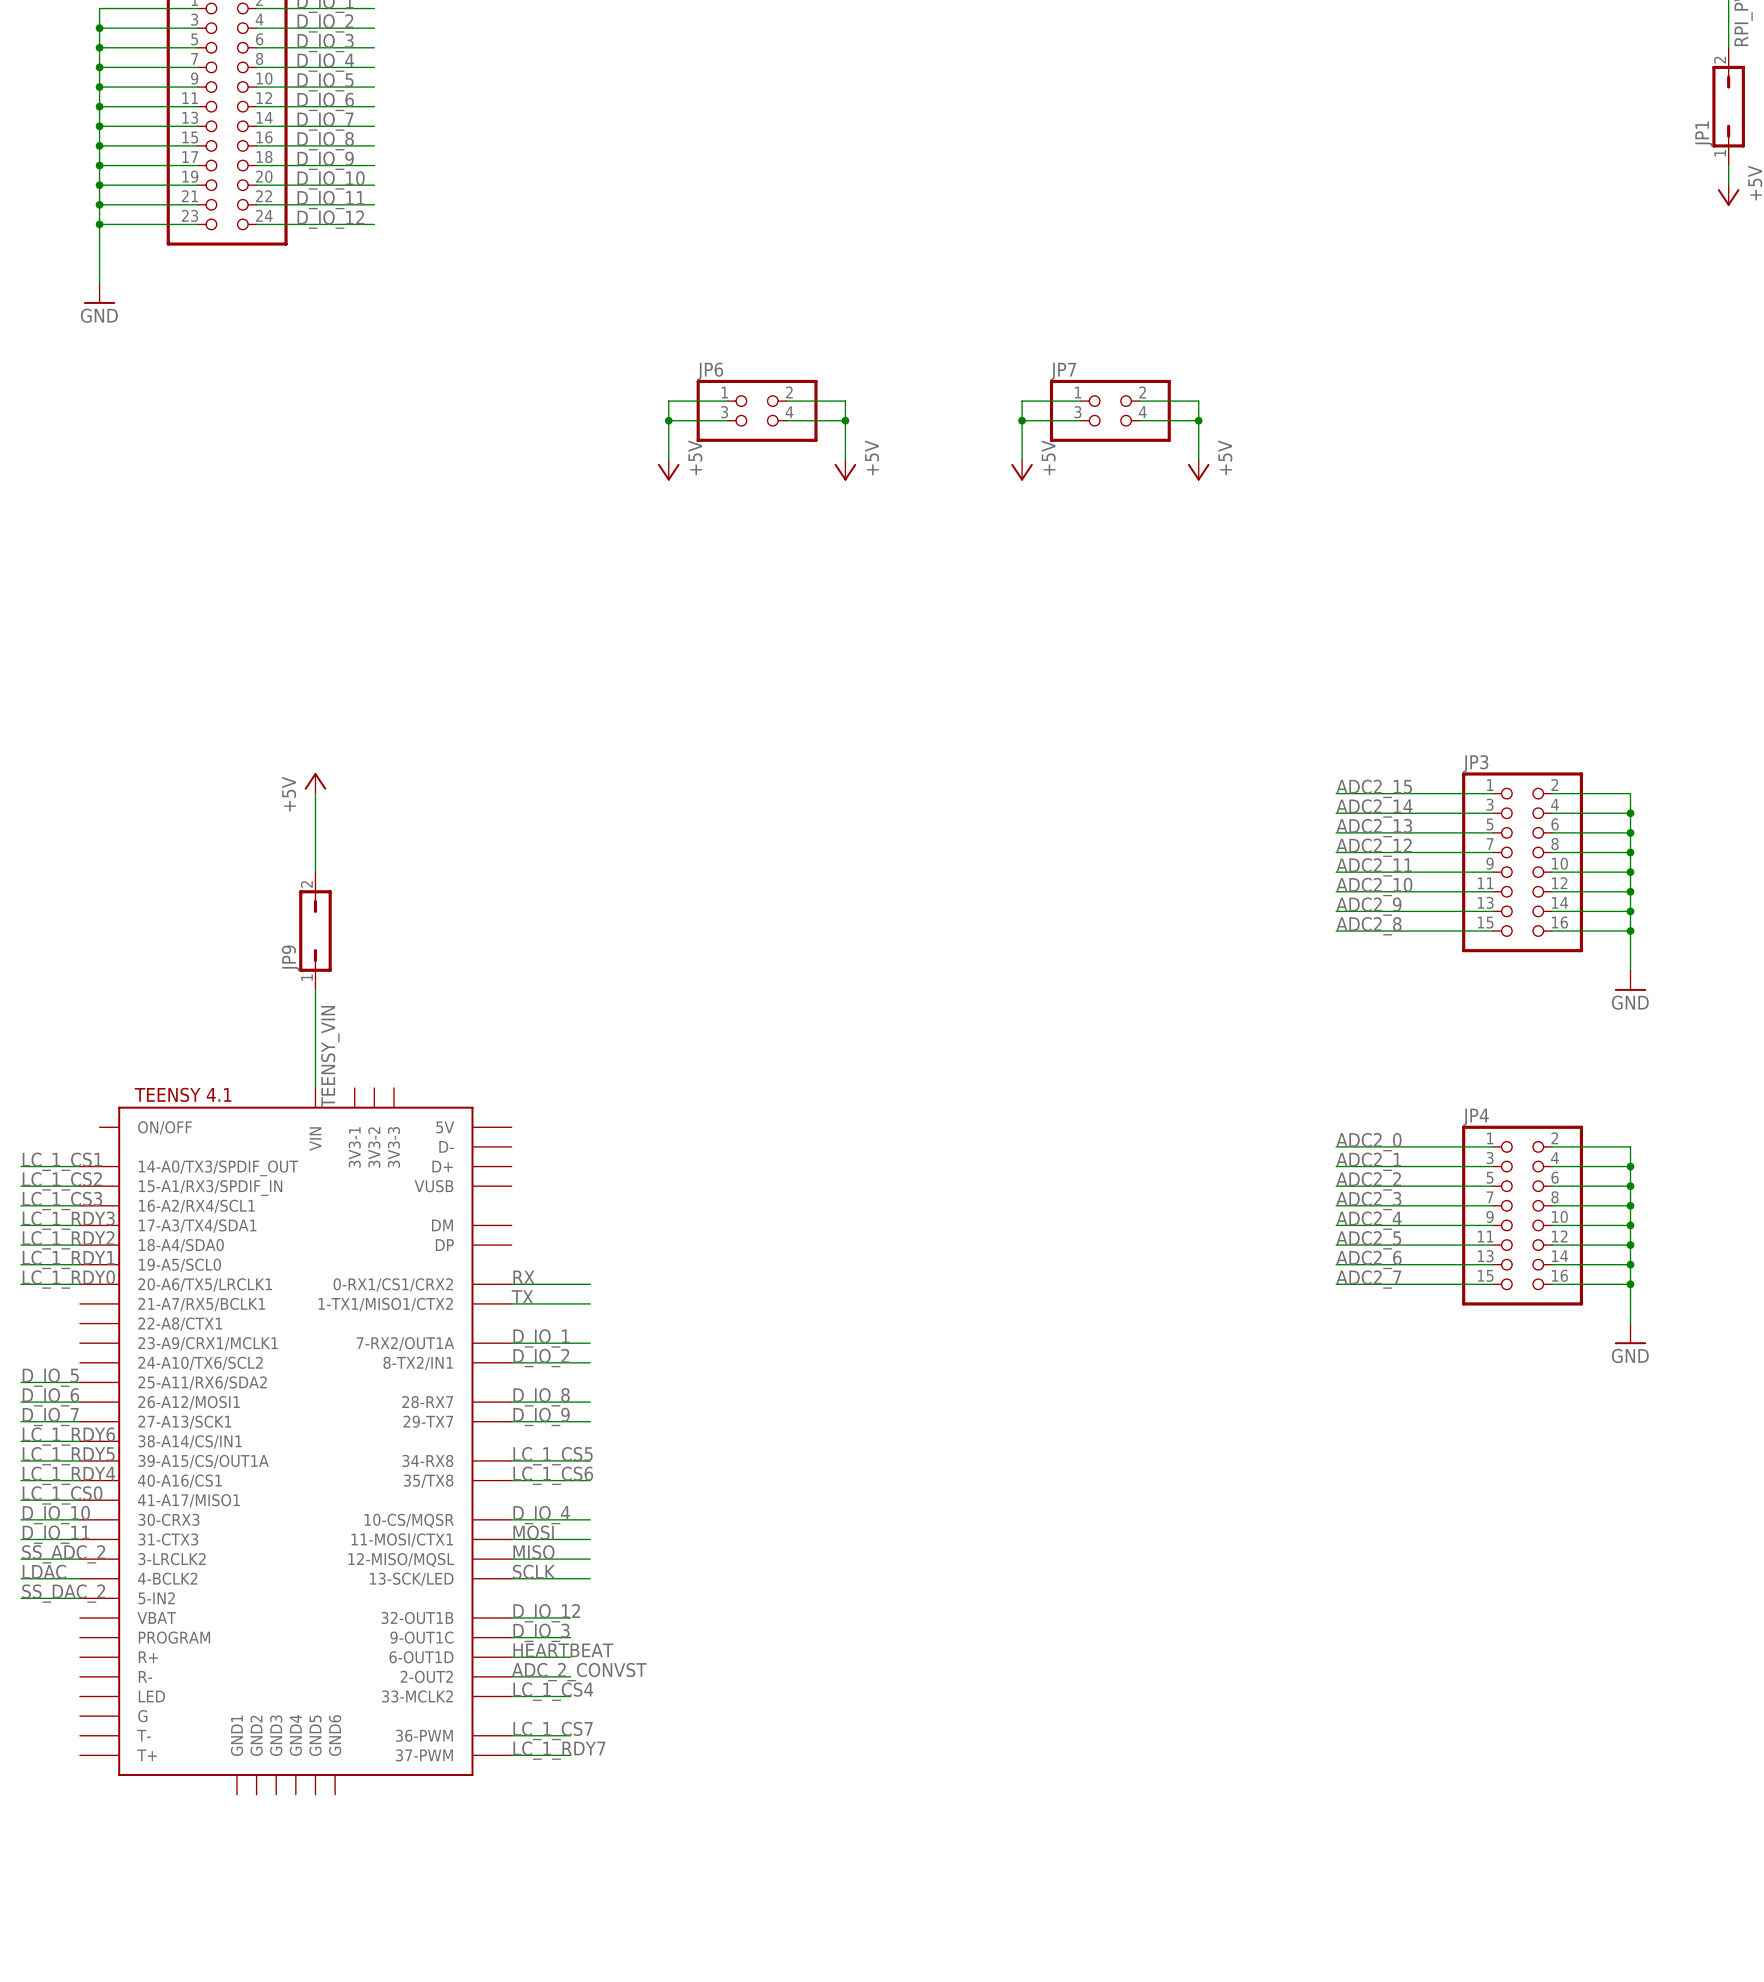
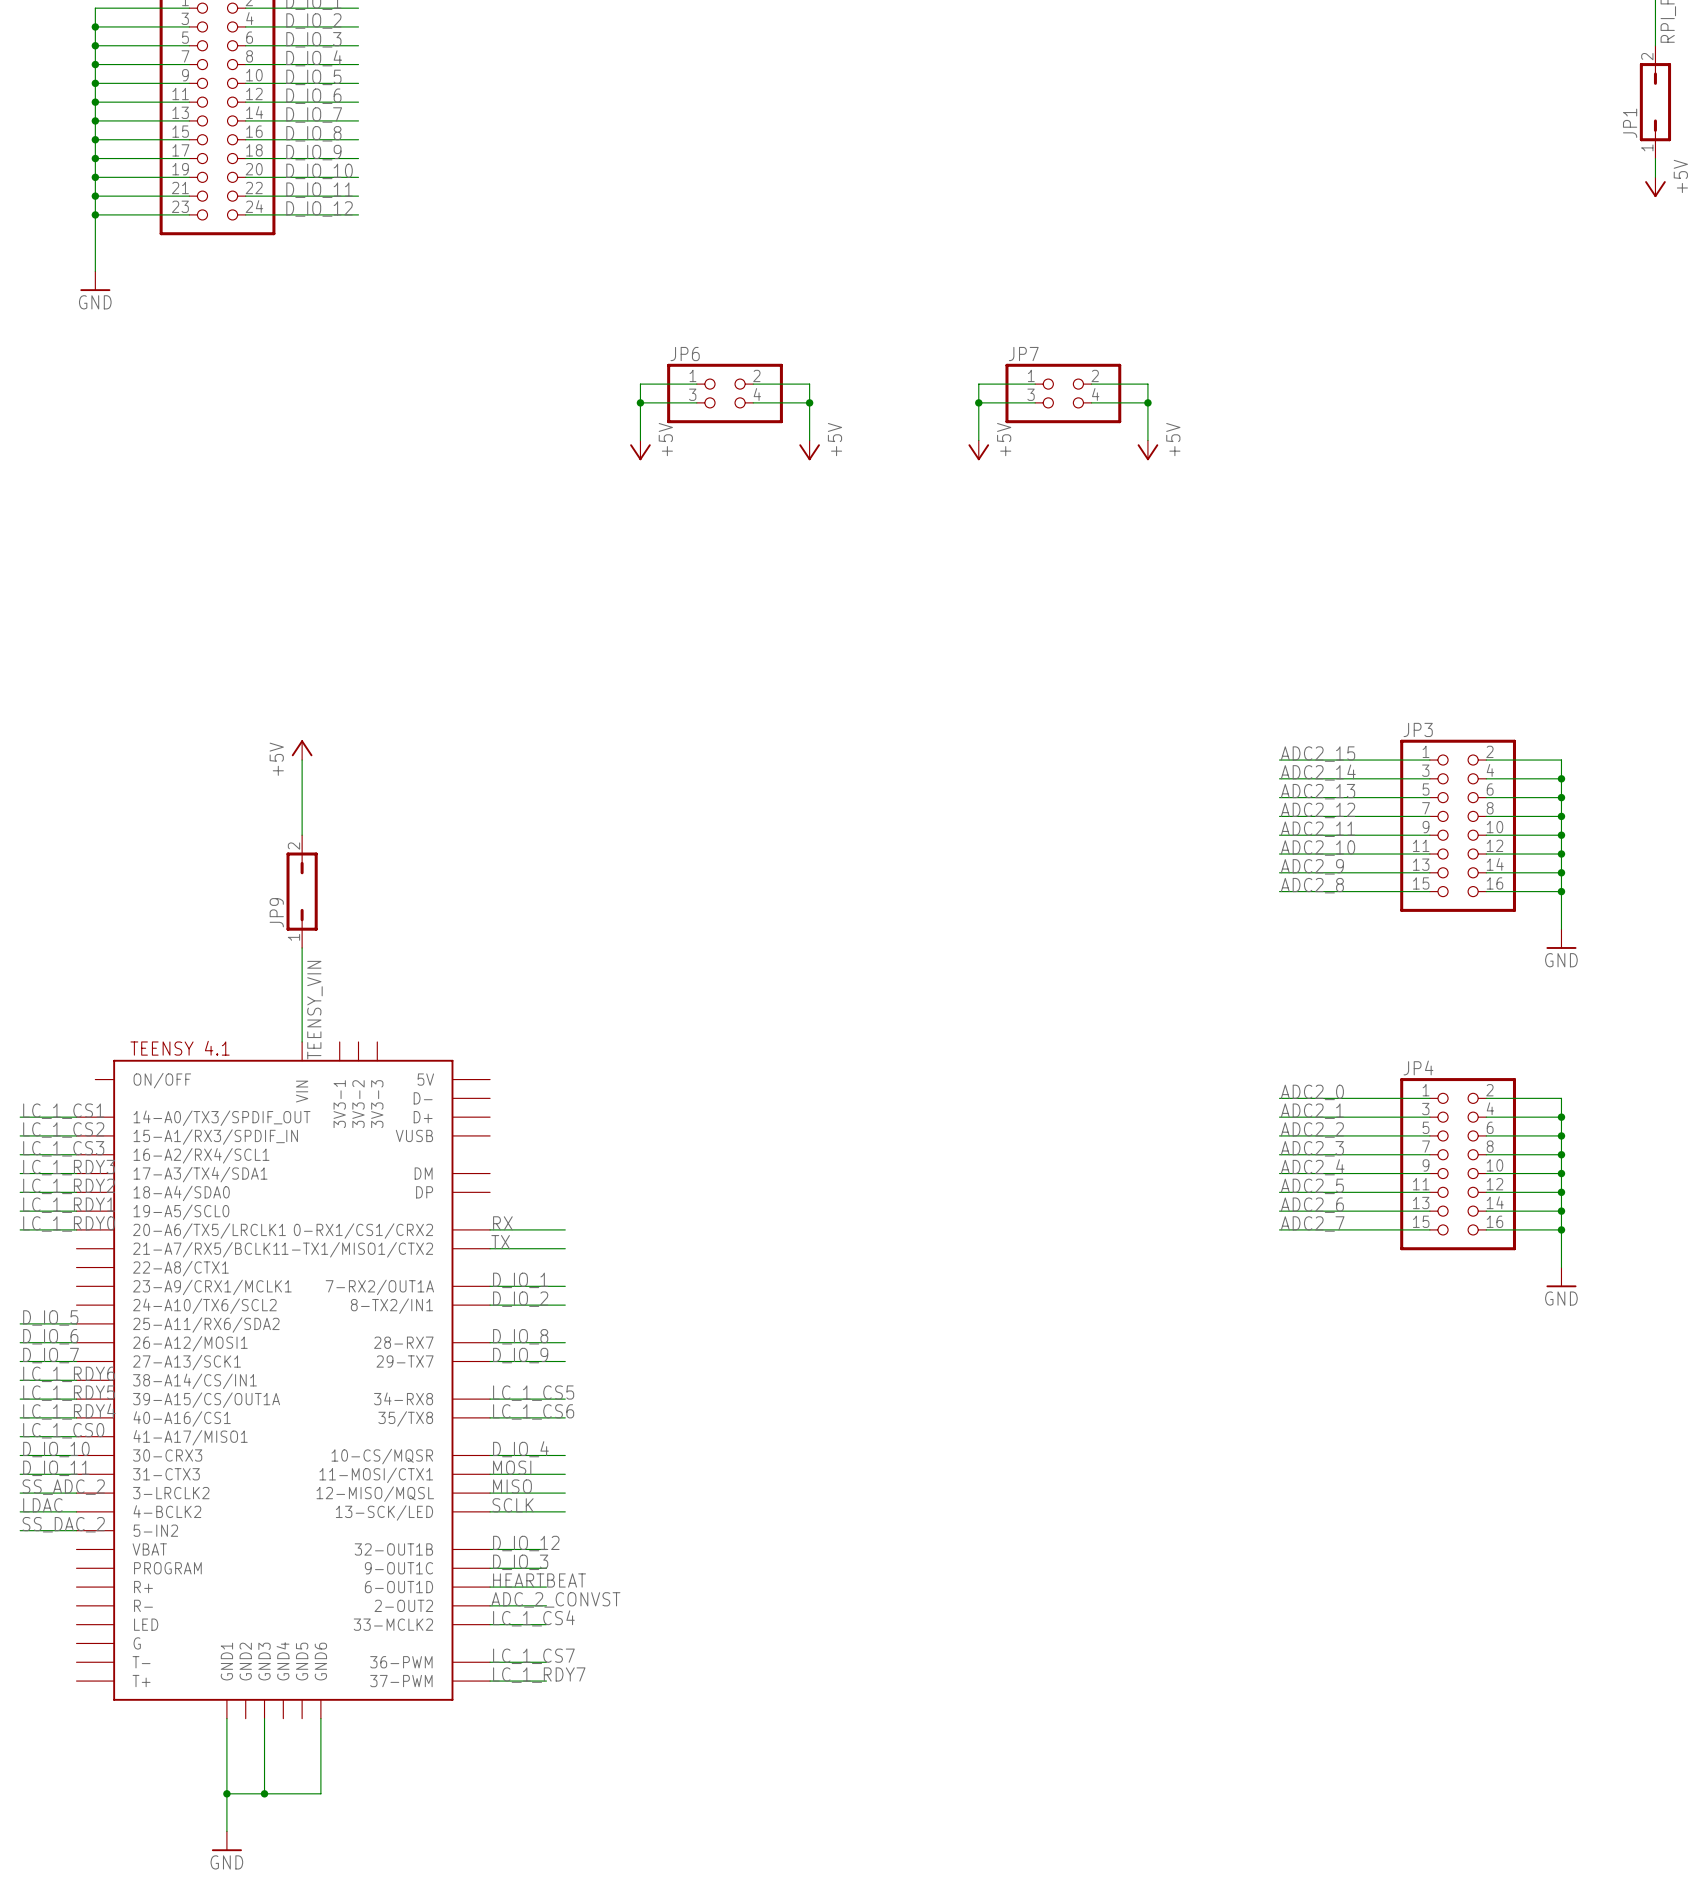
wire: none -> (226, 1718) (226, 1831)
wire: none -> (264, 1718) (264, 1793)
wire: none -> (320, 1718) (320, 1793) (226, 1793)
junction: none -> (226, 1793)
junction: none -> (264, 1793)
power symbol: none -> GND (226, 1841)

